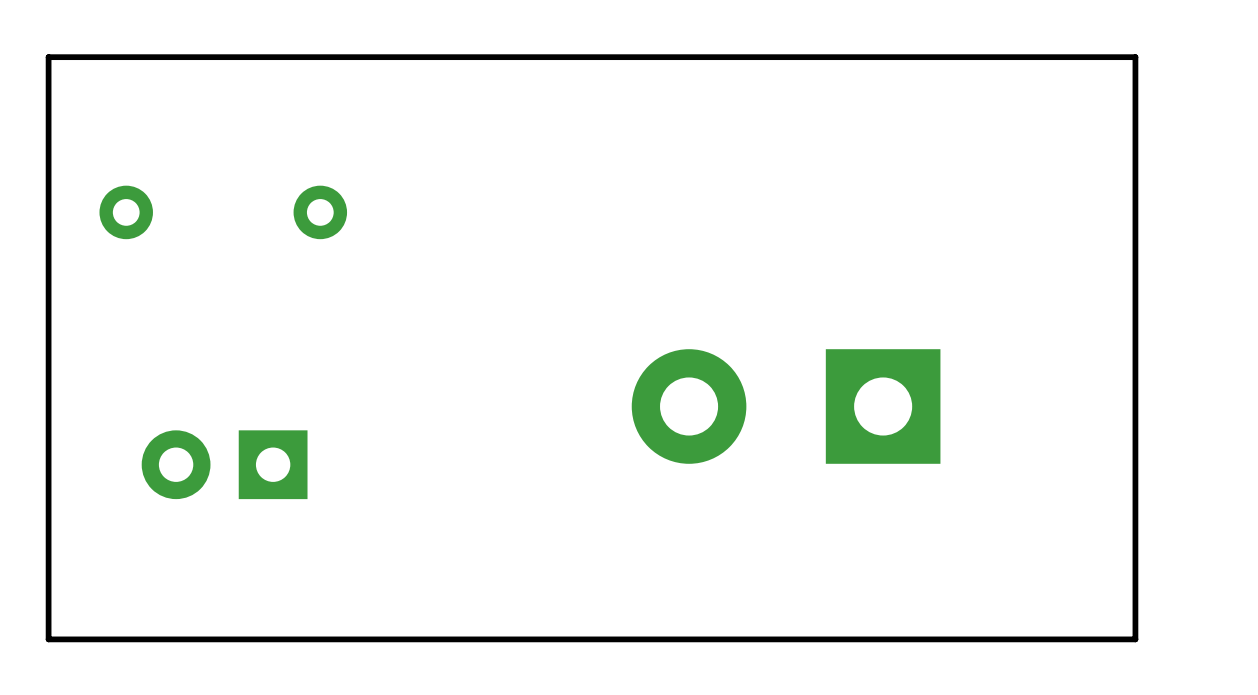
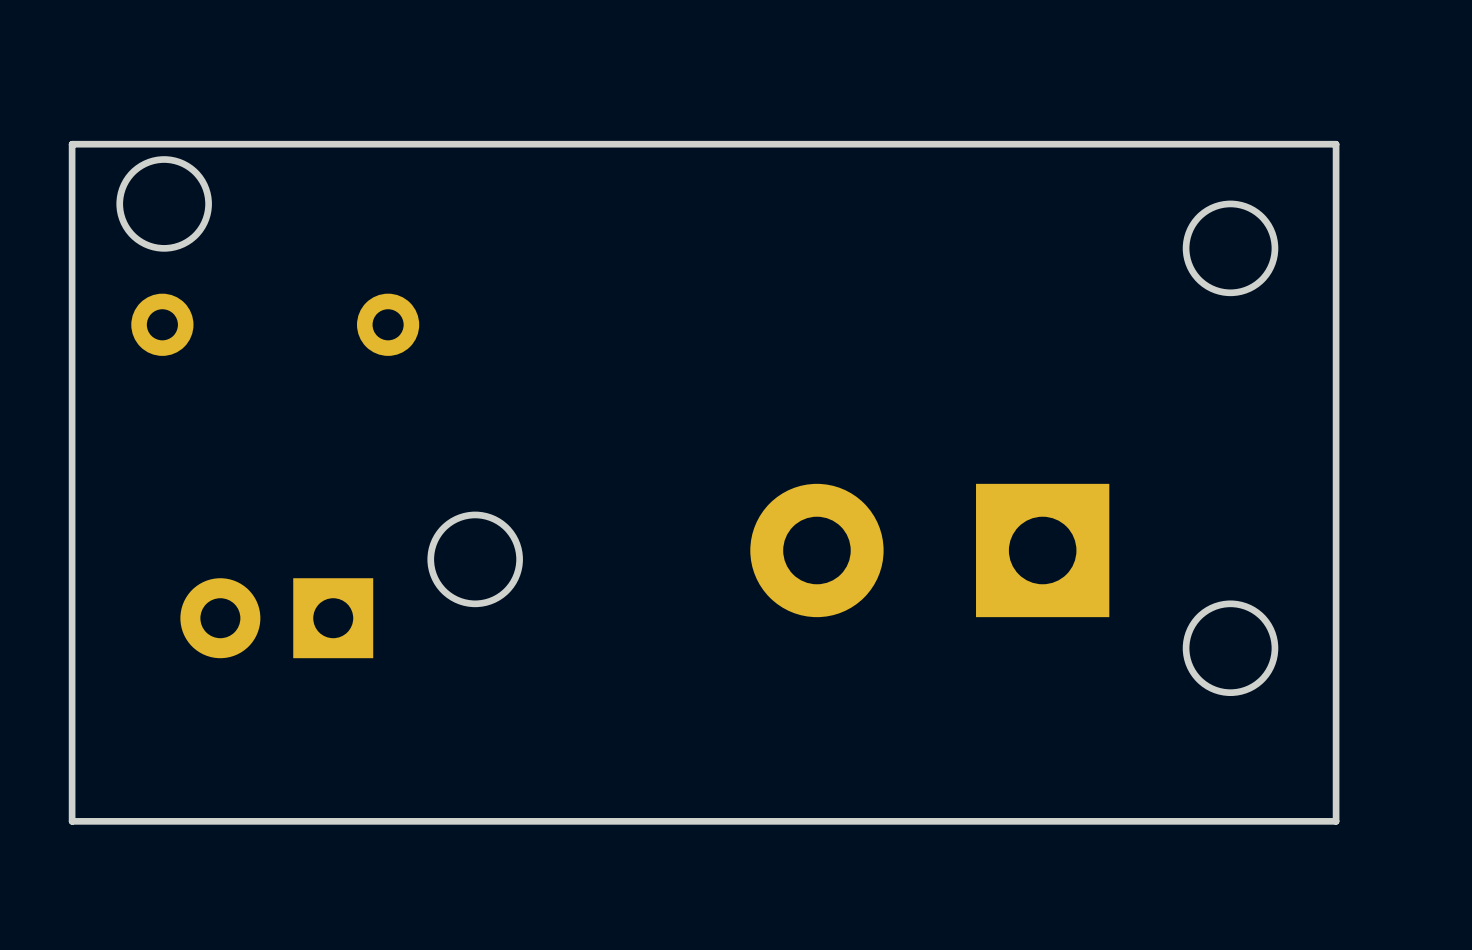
round board edge: none -> [116, 156, 212, 252]
round board edge: none -> [1182, 200, 1279, 297]
round board edge: none -> [427, 511, 523, 608]
round board edge: none -> [1182, 600, 1279, 697]

